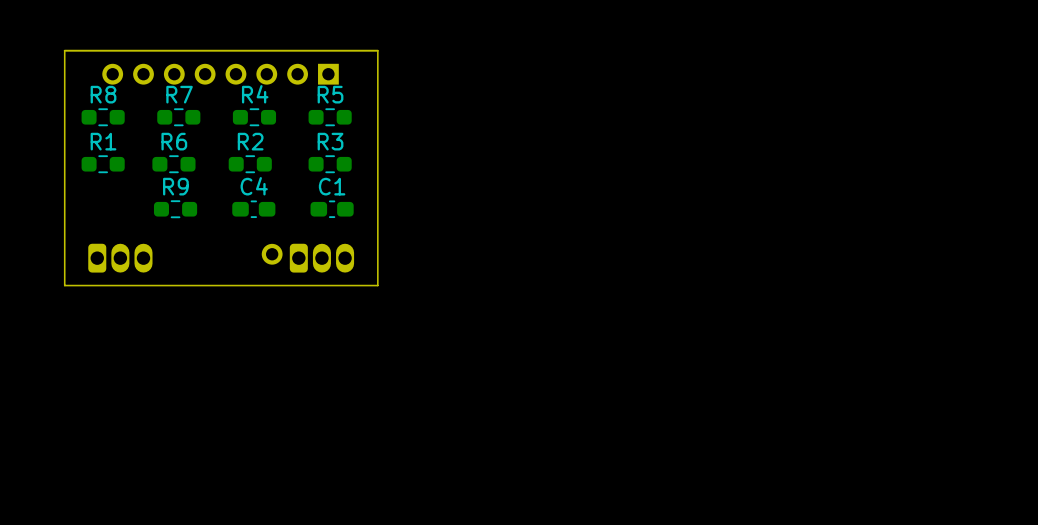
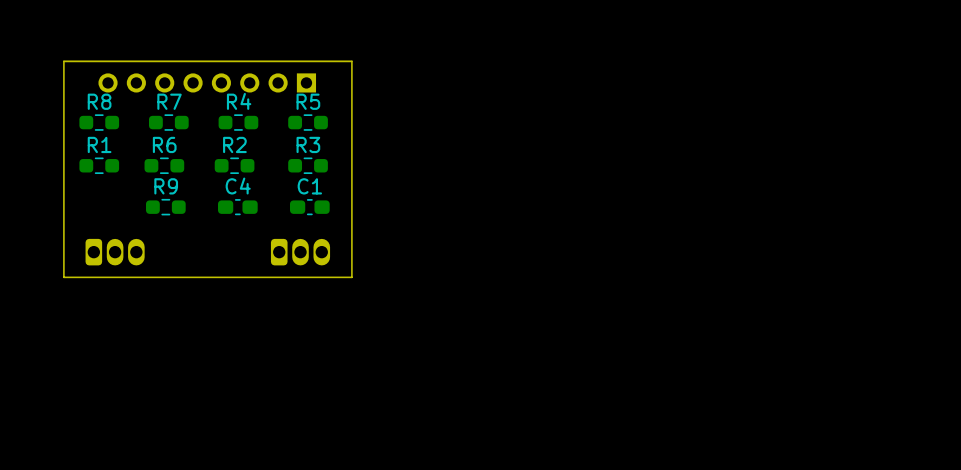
part: (272, 254) -> none

